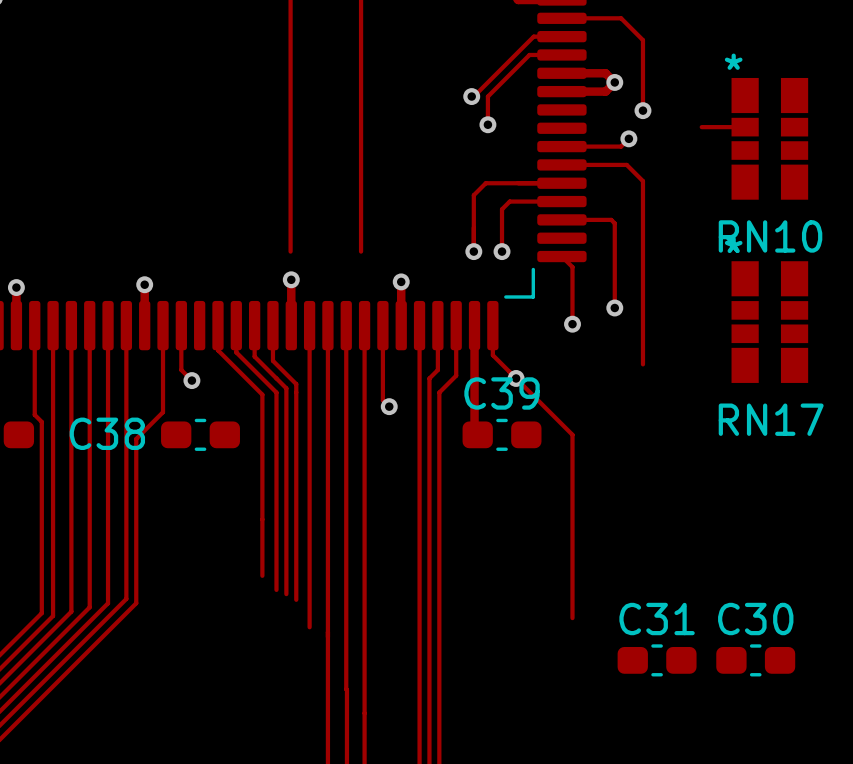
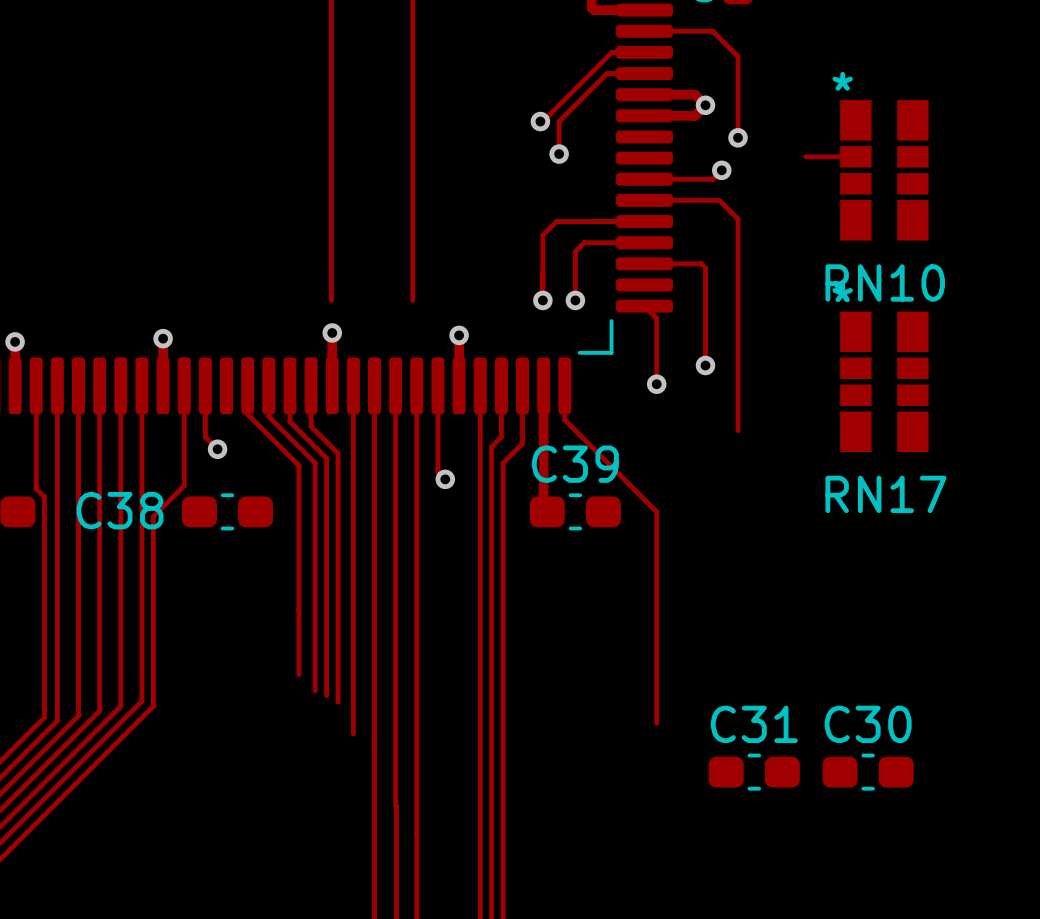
via: (516, 378) -> none

